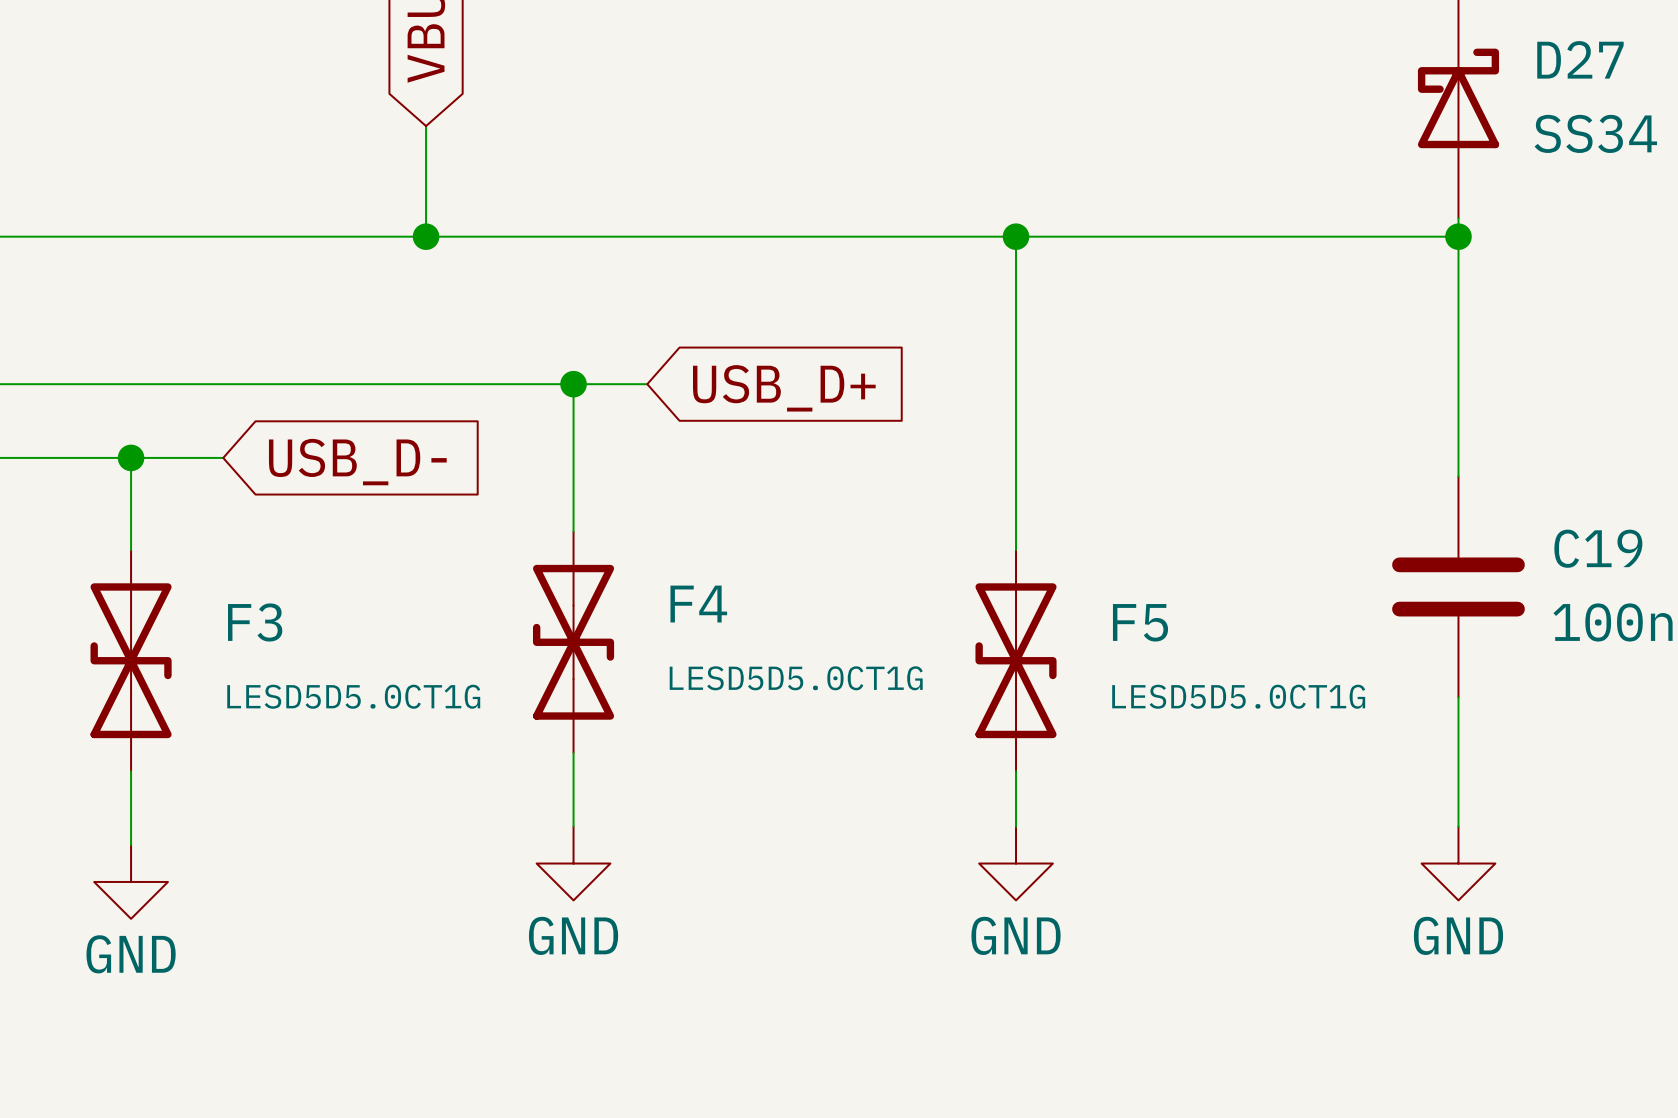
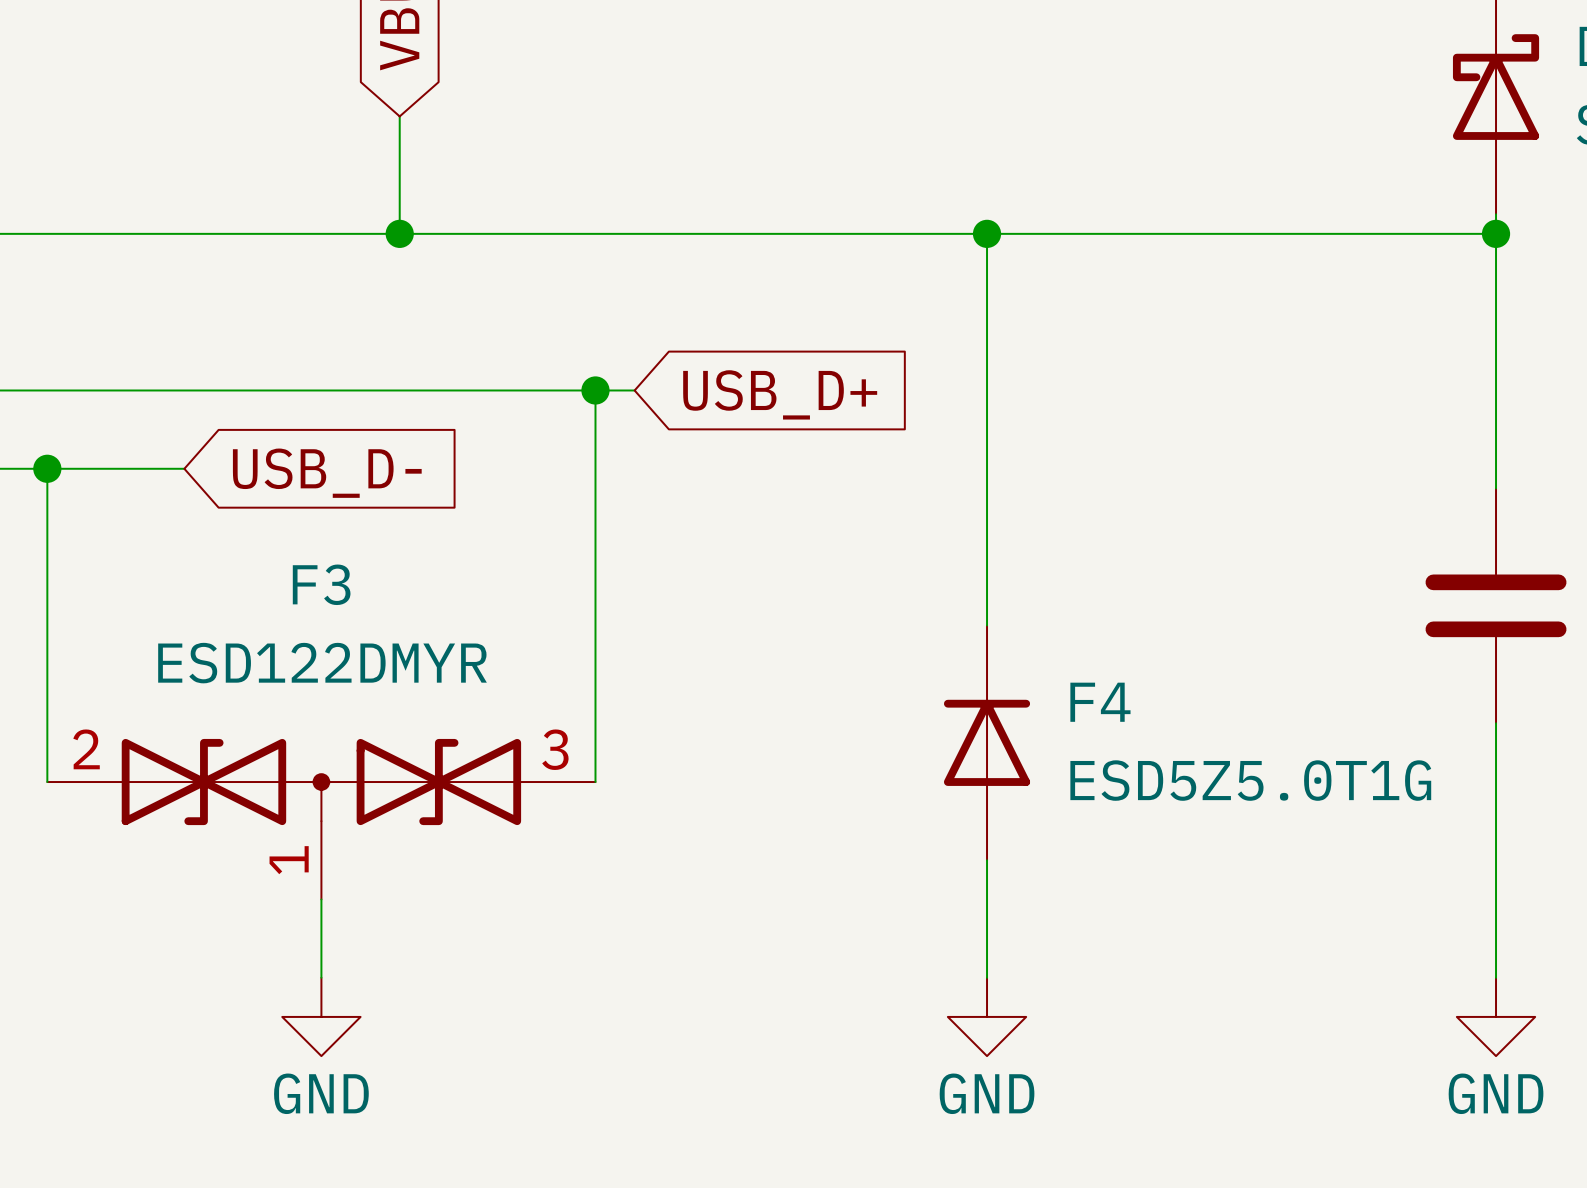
wire: none -> (987, 233) (987, 625)
wire: (1016, 236) (1016, 550) -> none
junction position: (1016, 236) -> (987, 233)
wire: (573, 384) (573, 531) -> none
junction position: (573, 384) -> (595, 390)
wire: none -> (595, 390) (595, 782)
wire: none -> (47, 468) (47, 782)
wire: (131, 457) (131, 550) -> none
junction position: (131, 457) -> (47, 468)
F4 symbol: [532, 531, 615, 753] -> [943, 625, 1031, 861]
F3 symbol: [90, 550, 172, 772] -> [47, 738, 596, 900]
F3 name position: F3 (255, 622) -> F3 (321, 584)
F5: LESD5D5.0CT1G (1016, 660) -> none
F4 value: LESD5D5.0CT1G (796, 678) -> ESD5Z5.0T1G (1250, 780)
F3 value: LESD5D5.0CT1G (353, 696) -> ESD122DMYR (322, 663)
wire: (573, 752) (573, 826) -> none
wire: (131, 771) (131, 845) -> (321, 899) (321, 977)
wire: (1016, 771) (1016, 826) -> none
wire: none -> (987, 860) (987, 977)
wire: none -> (1496, 860) (1496, 977)
power symbol: GND (573, 863) -> none
power symbol position: GND (1016, 863) -> GND (987, 1016)
power symbol position: GND (1458, 863) -> GND (1496, 1016)
power symbol: GND (131, 881) -> none
power symbol: none -> GND (321, 1016)

